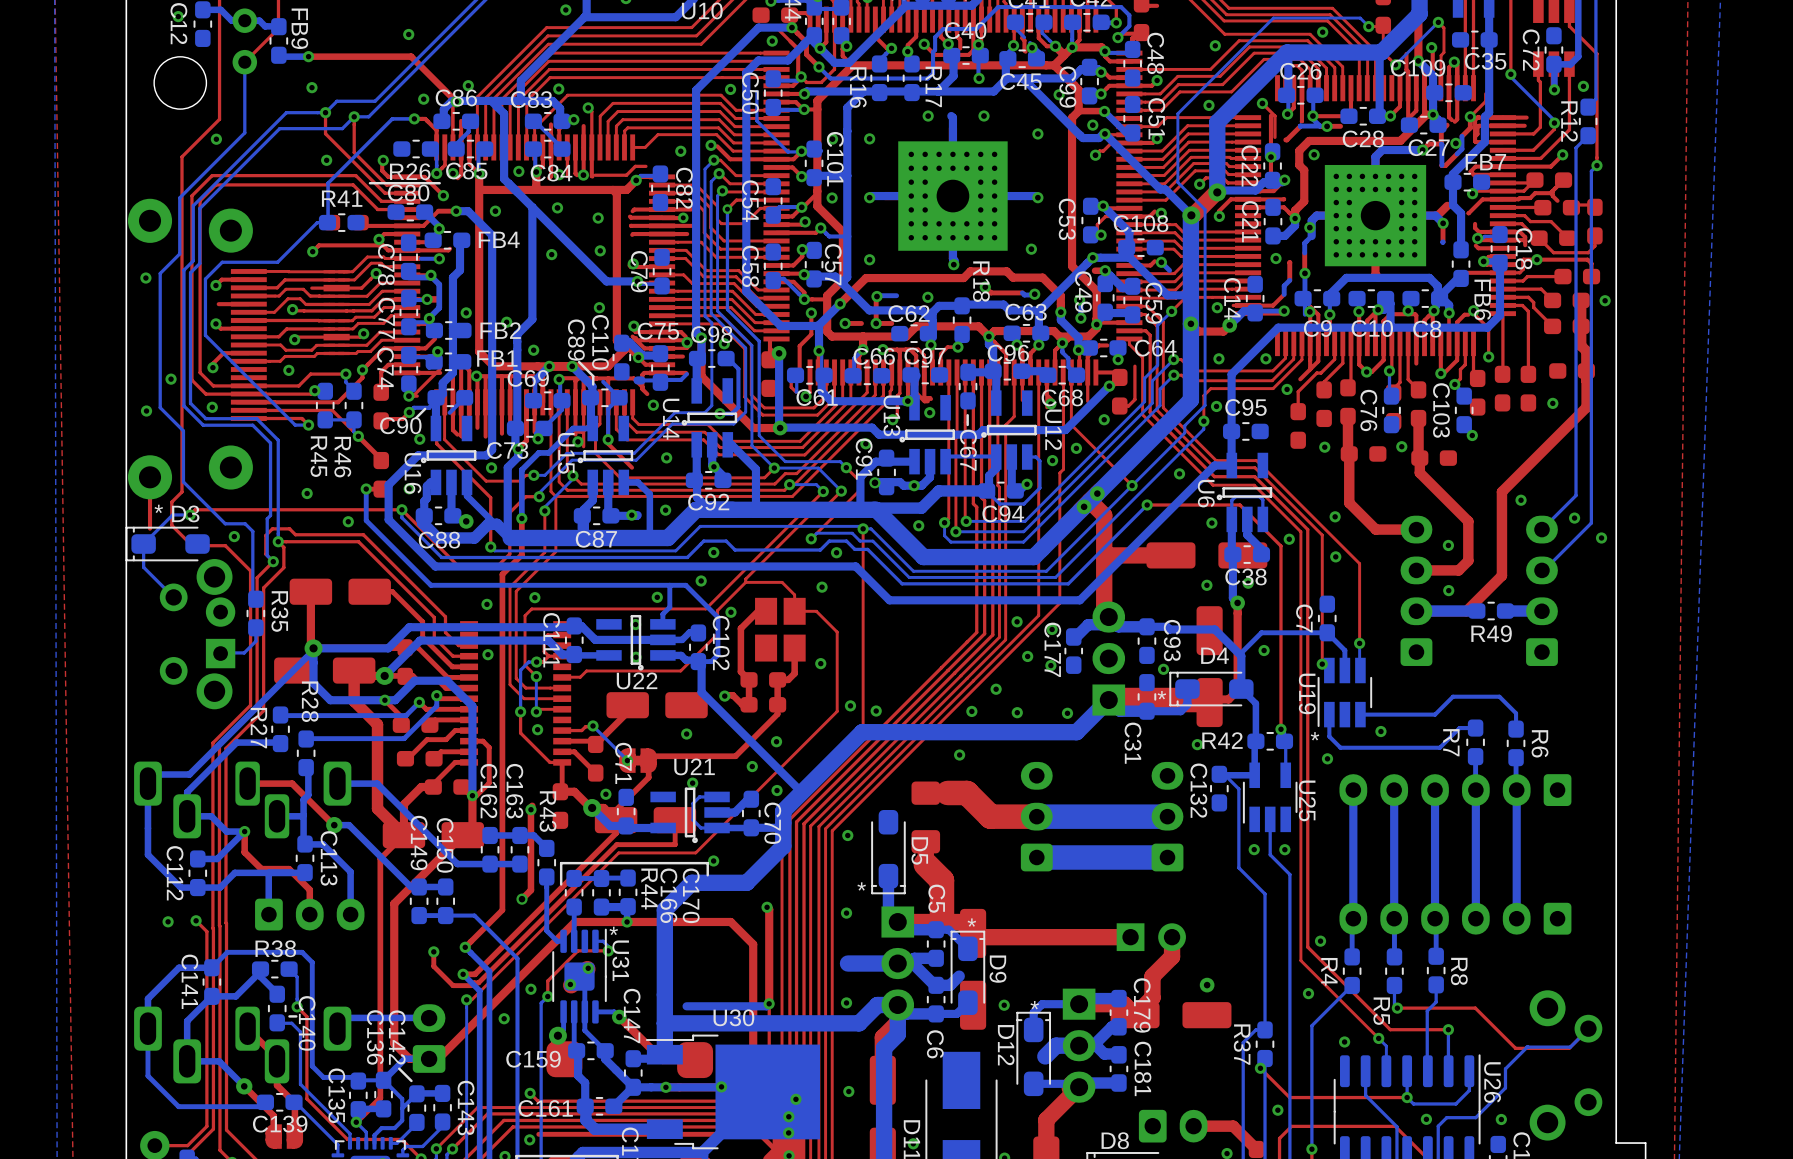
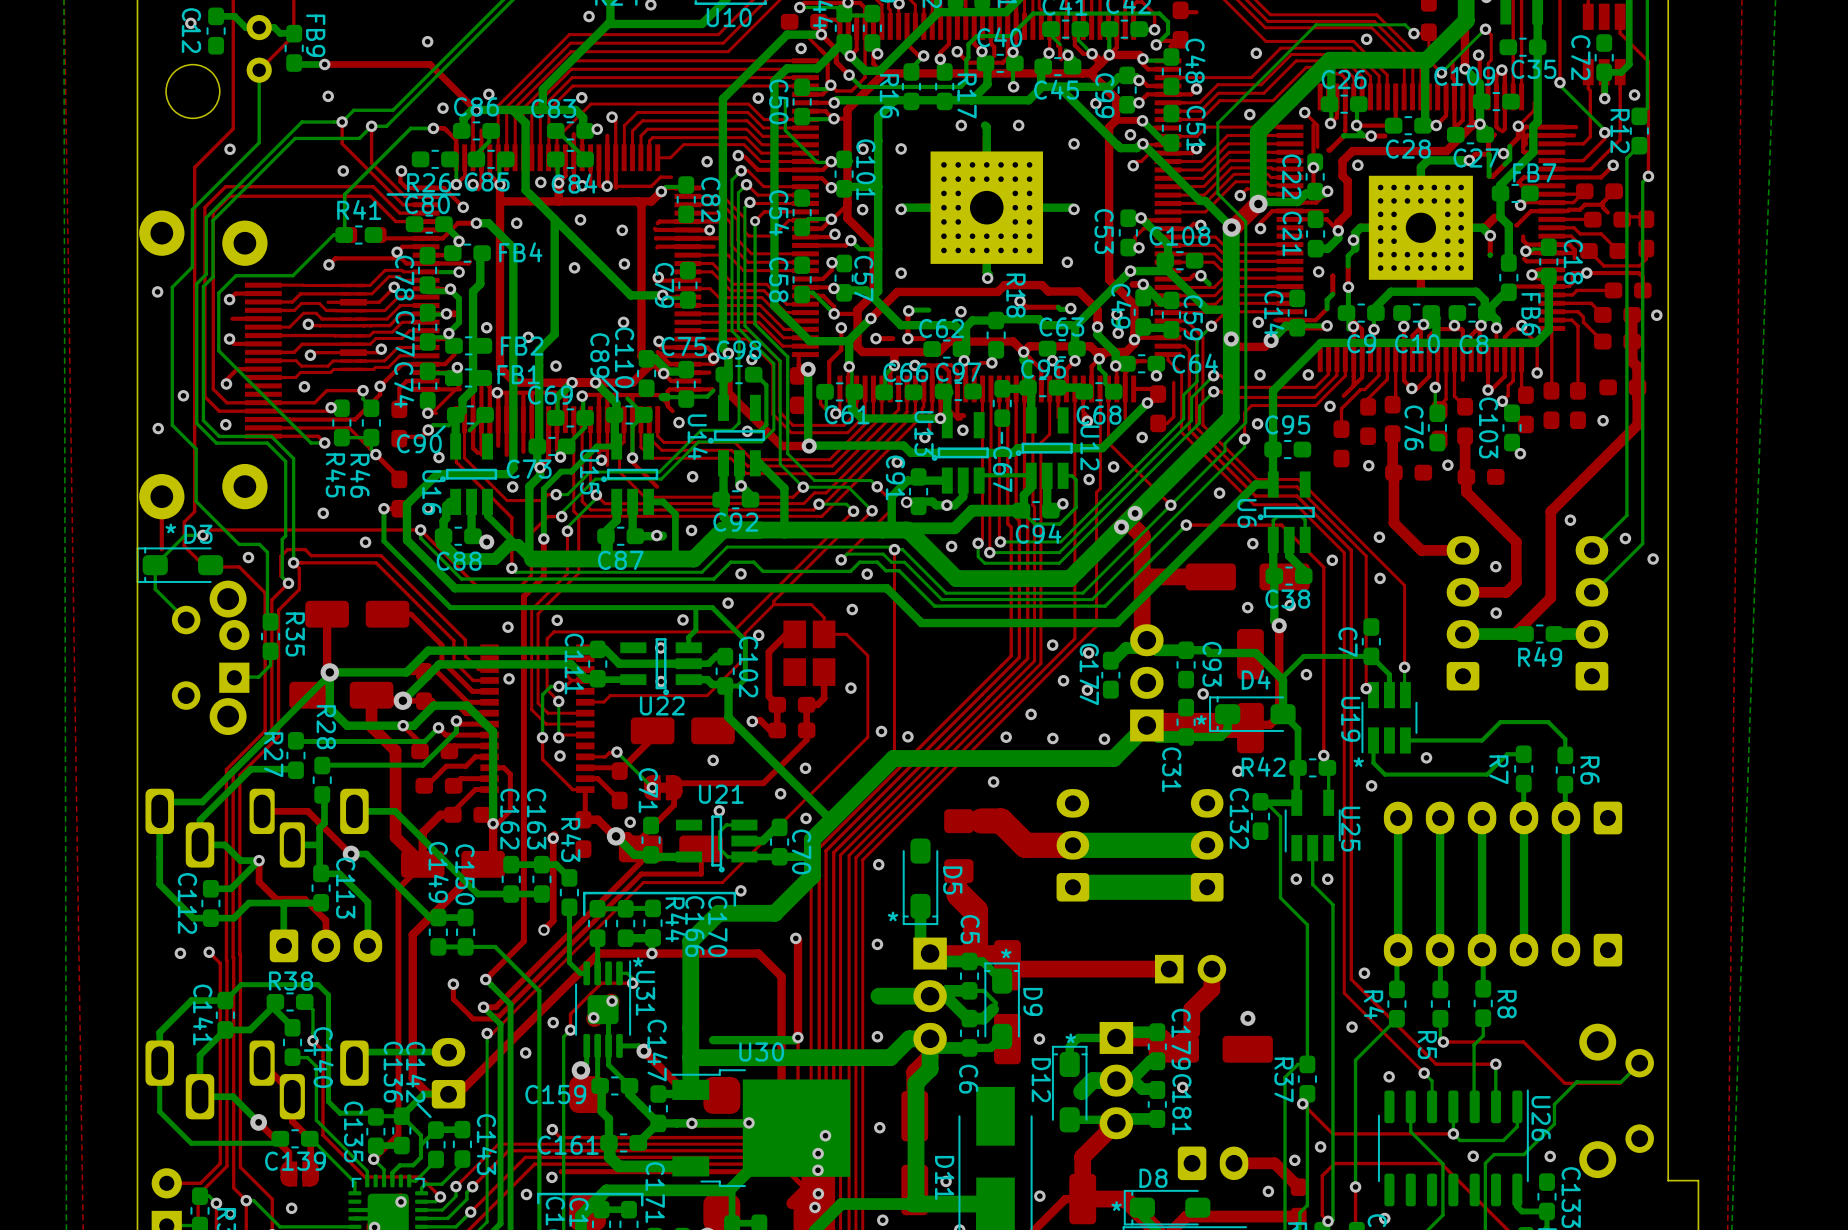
bottom track: none -> (969, 990) (983, 990) (996, 1003)
via: none -> (1182, 1087)
via: none -> (1294, 1160)

